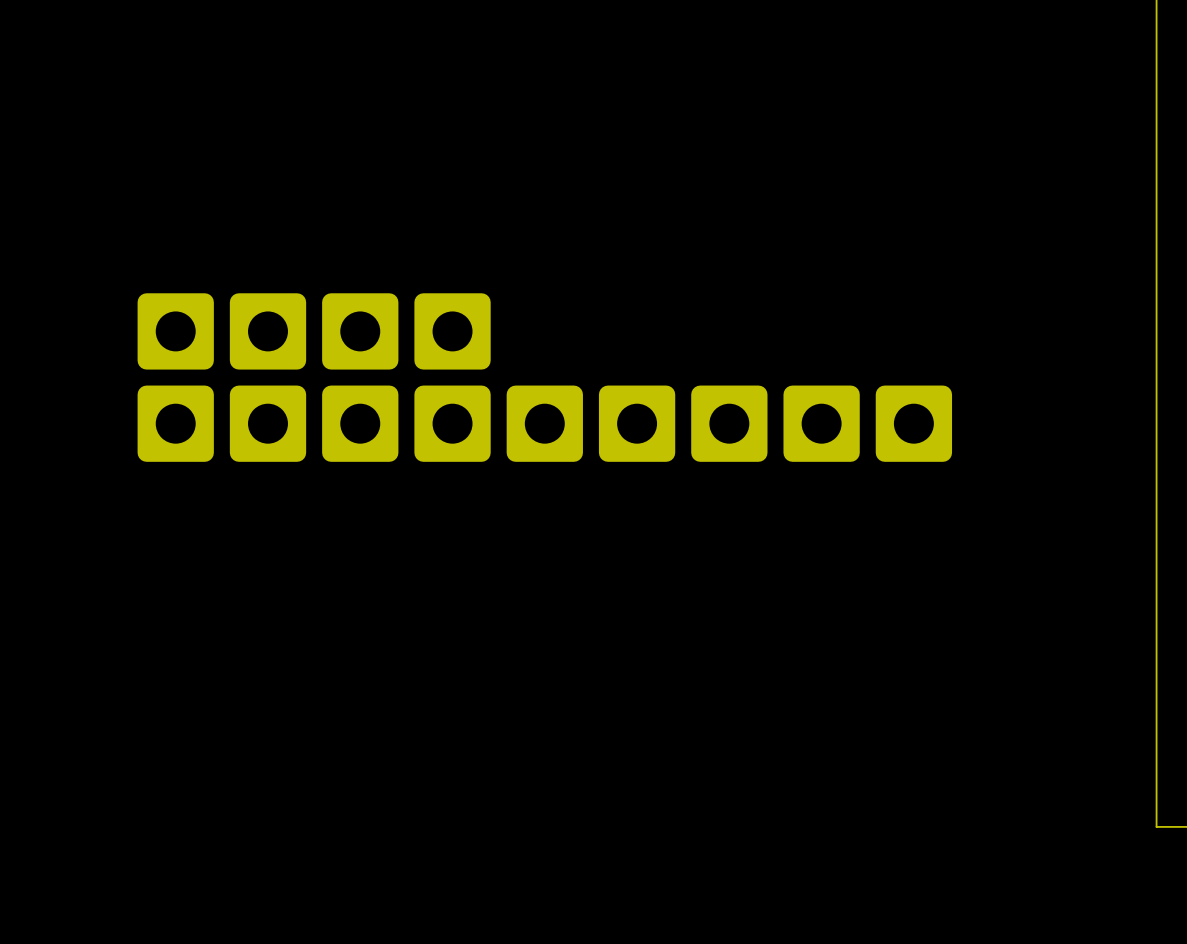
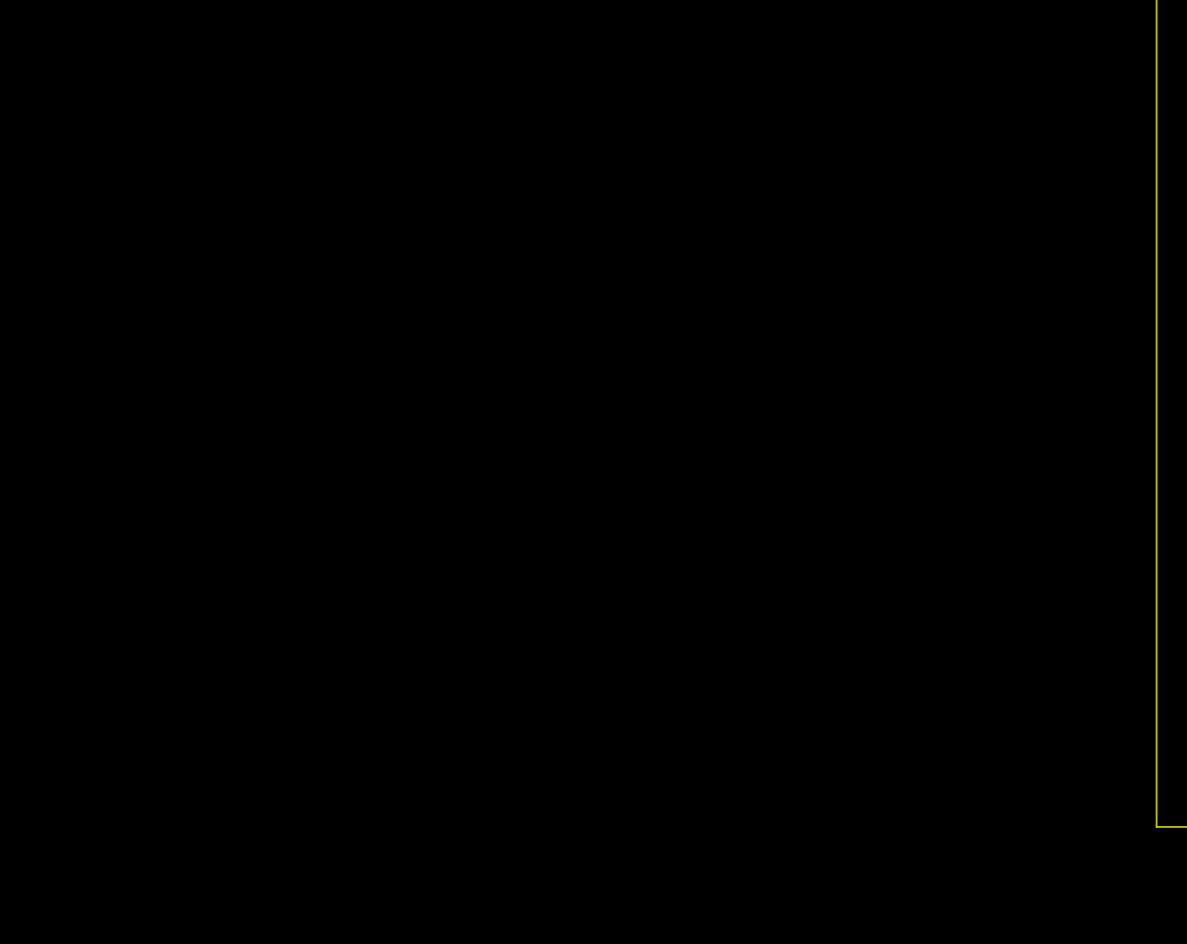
part: (175, 331) -> none
part: (267, 331) -> none
part: (360, 331) -> none
part: (452, 331) -> none
part: (175, 423) -> none
part: (267, 423) -> none
part: (360, 423) -> none
part: (452, 423) -> none
part: (544, 423) -> none
part: (637, 423) -> none
part: (729, 423) -> none
part: (821, 423) -> none
part: (913, 423) -> none

